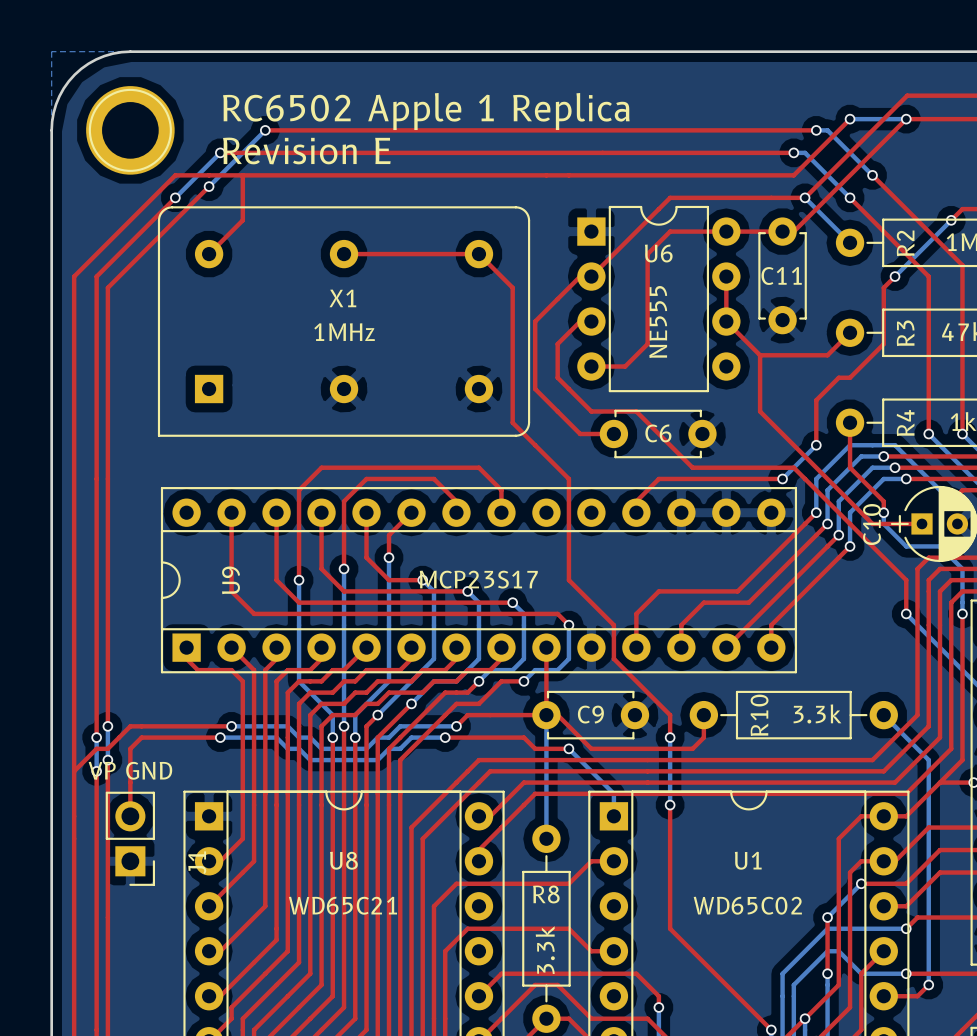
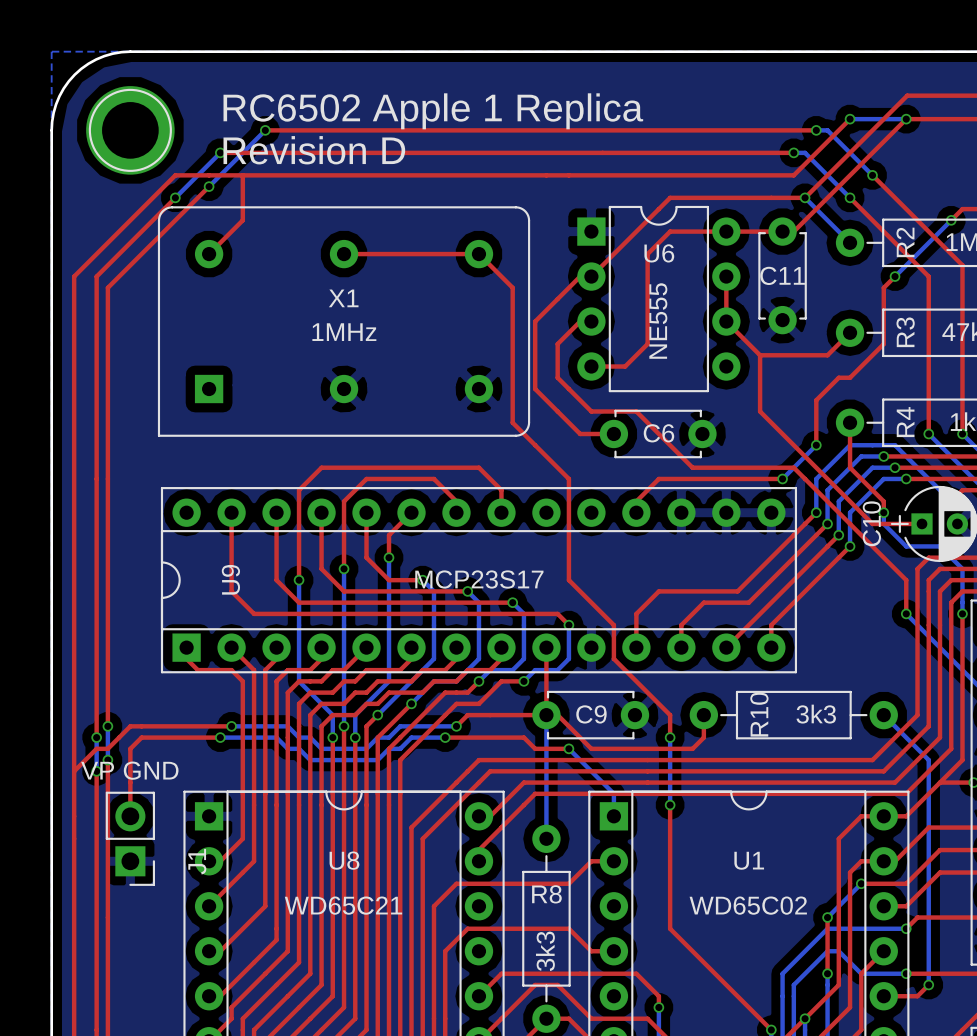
text: Revision E (306, 151) -> Revision D (314, 150)
R10 value: 3.3k (817, 713) -> 3k3 (816, 714)
R8 value: 3.3k (545, 950) -> 3k3 (545, 951)

